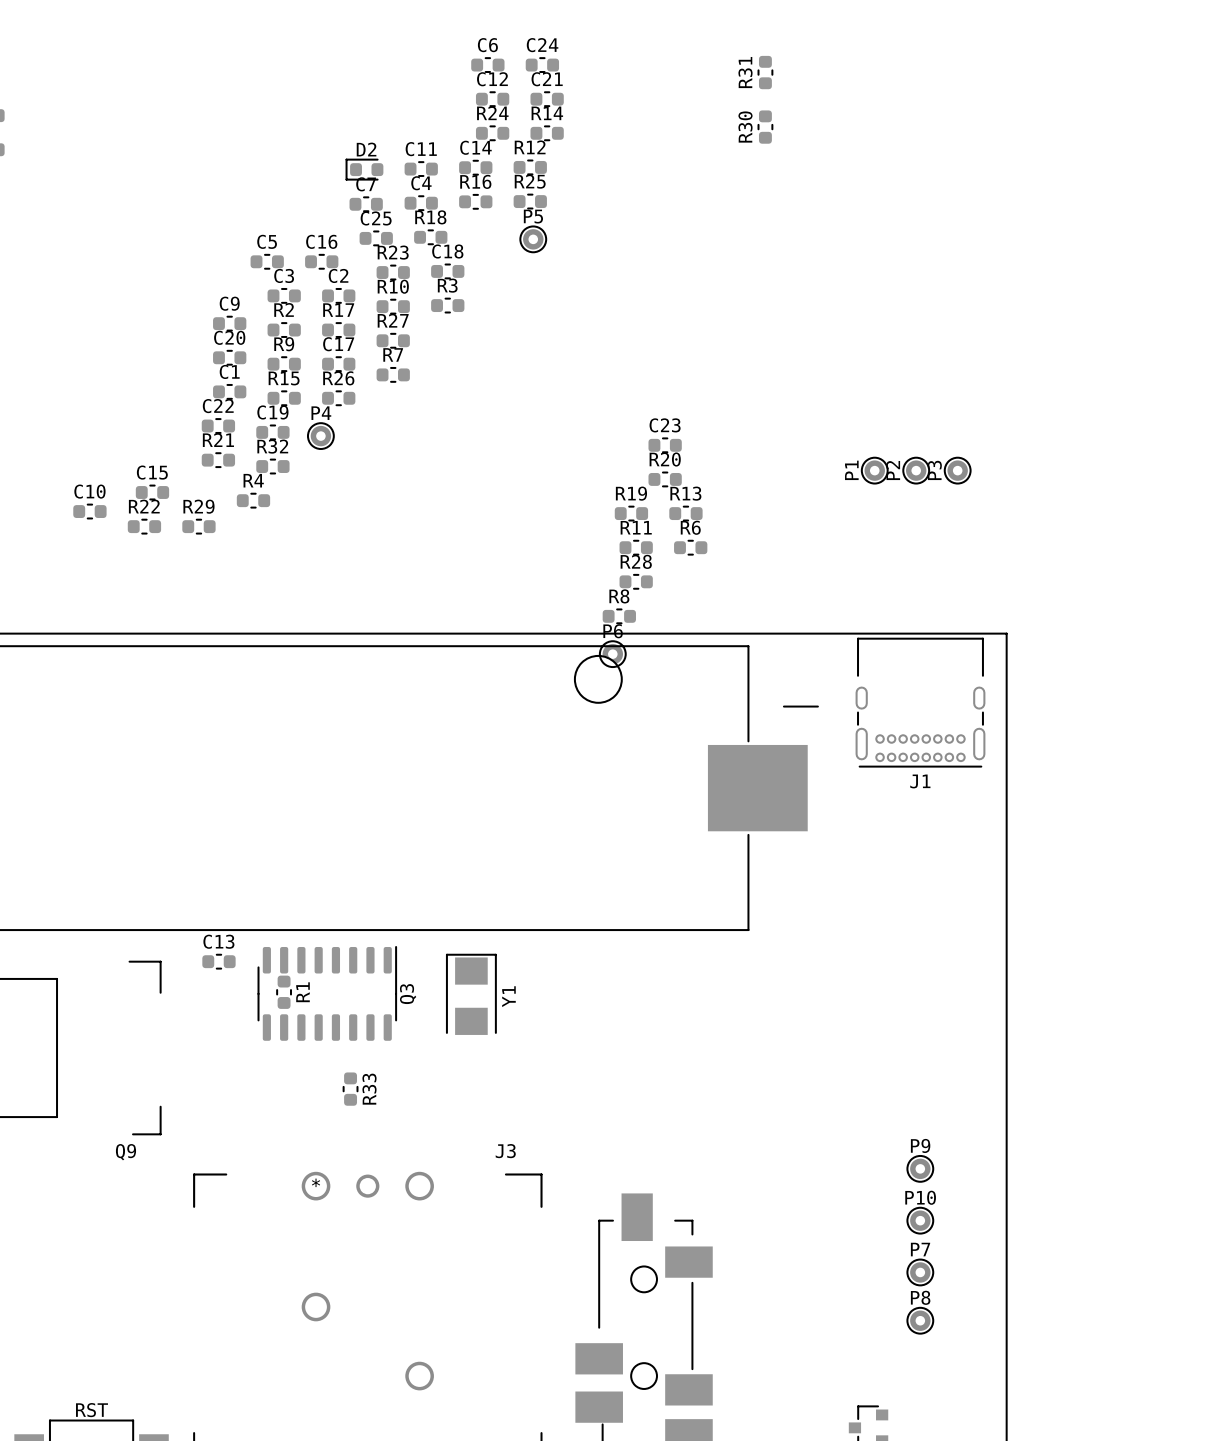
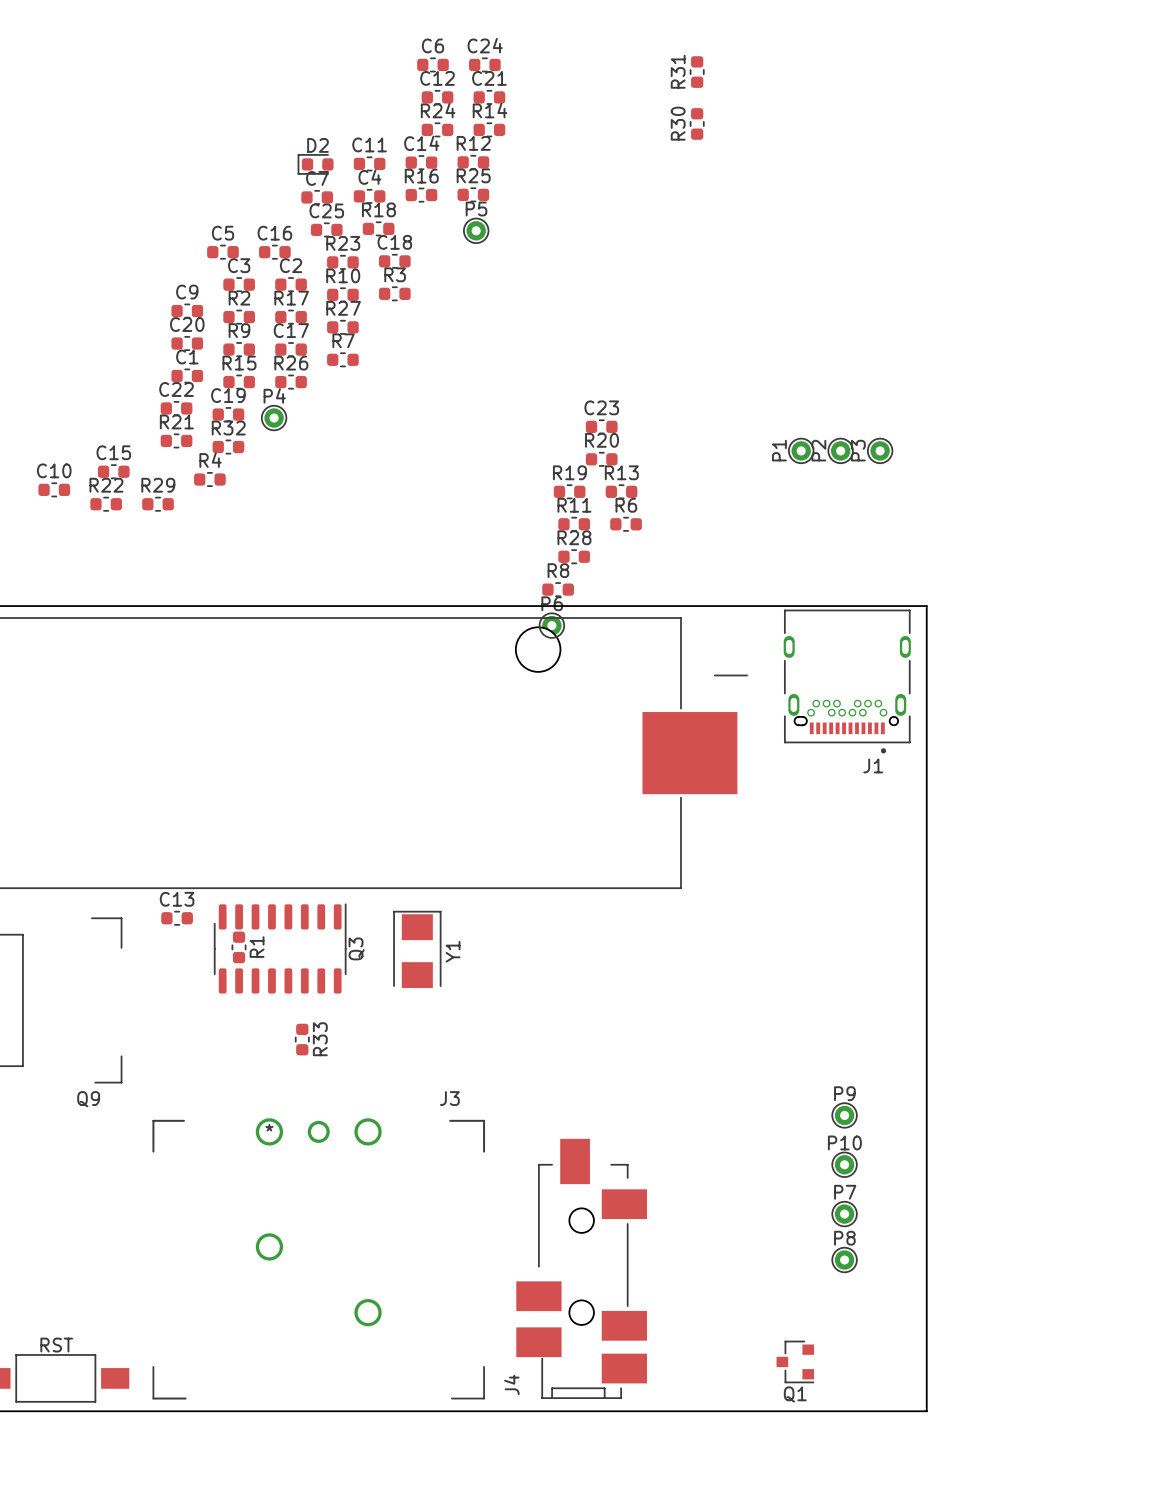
J1 footprint: [855, 637, 986, 768] -> [783, 609, 911, 754]
J1 name position: J1 (920, 781) -> J1 (873, 765)

